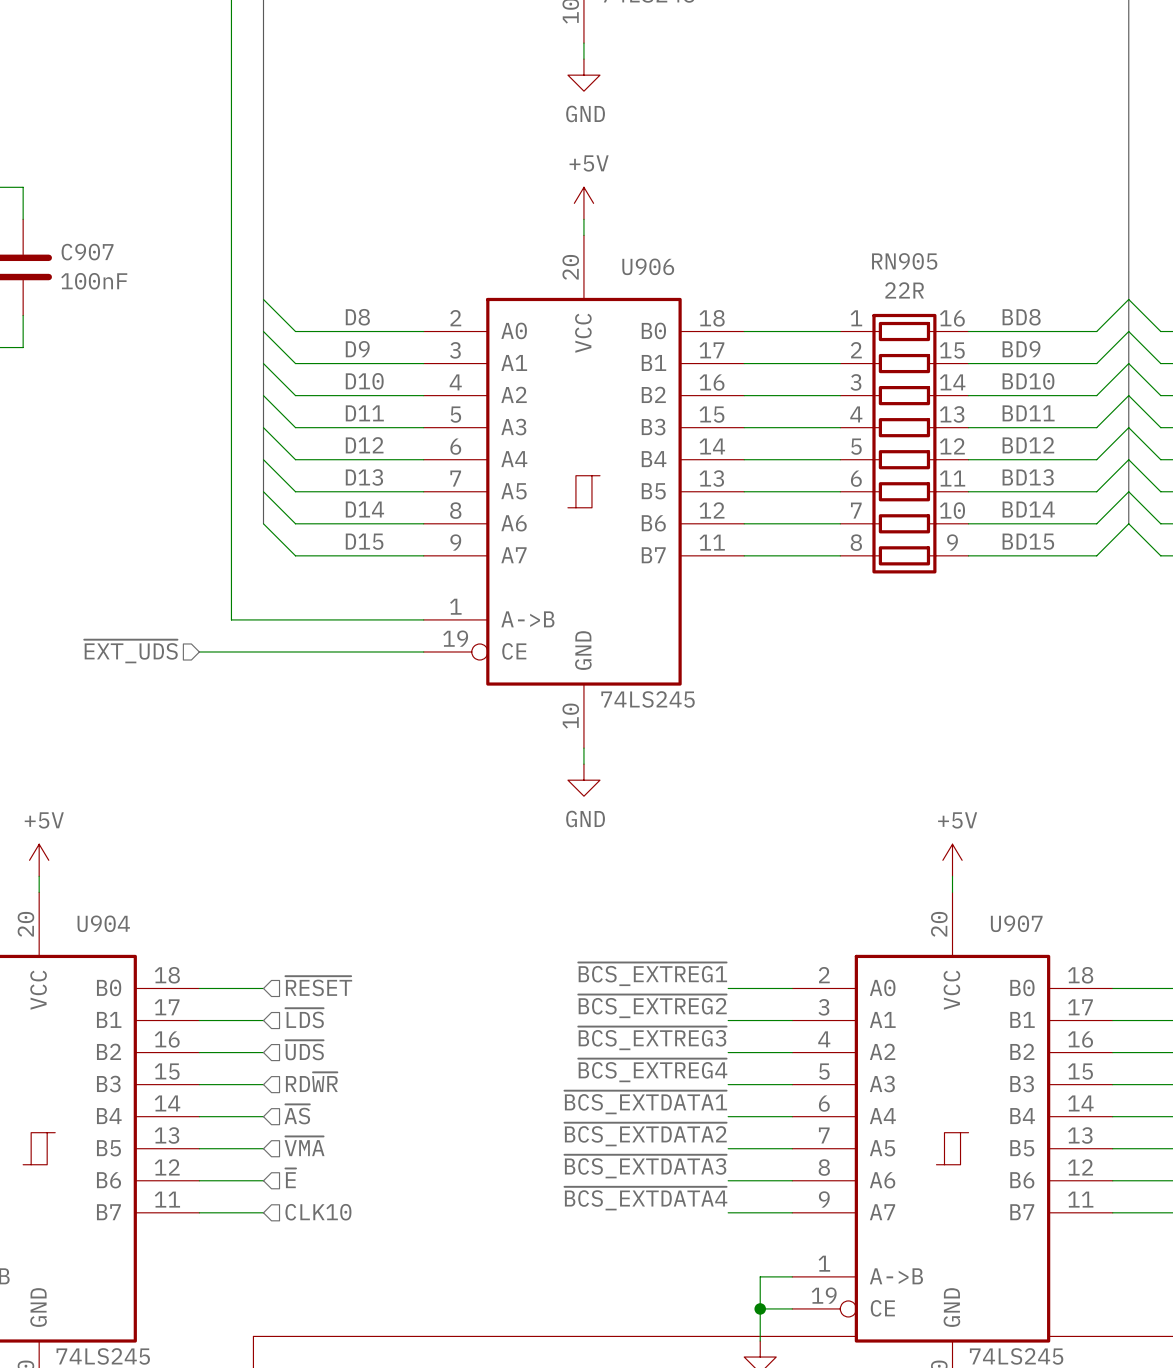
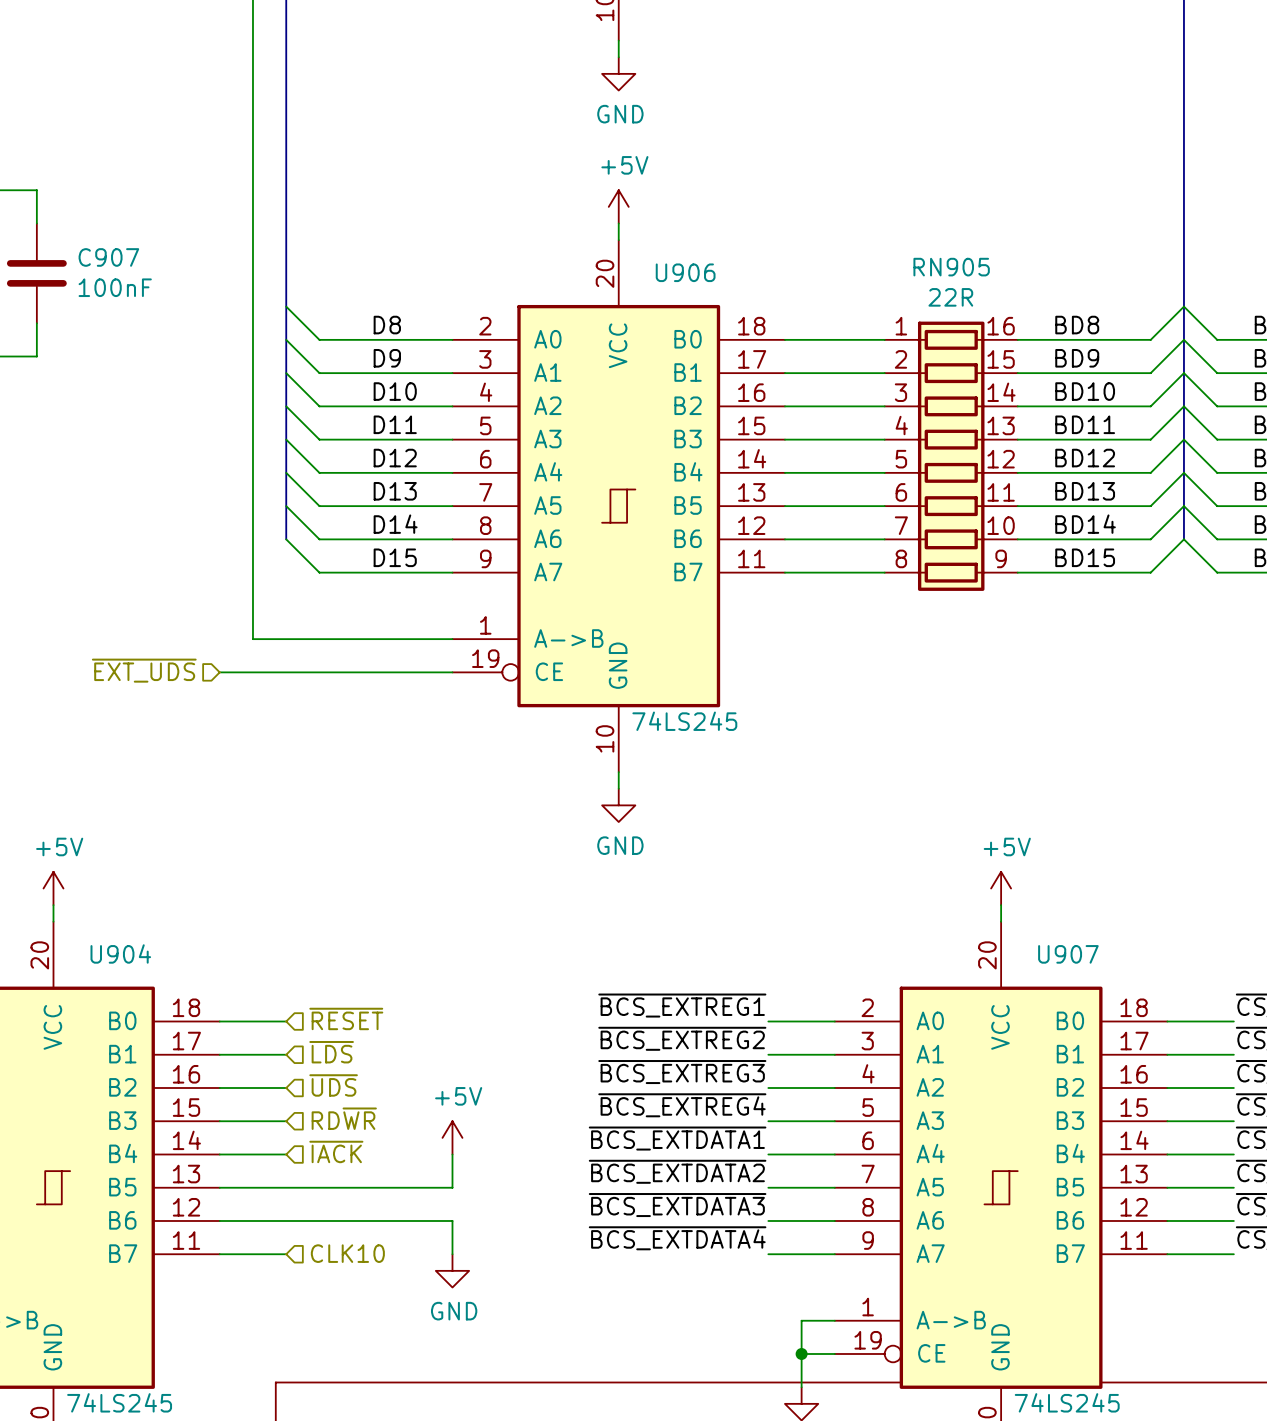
power symbol: none -> +5V (452, 1137)
hierarchical label: ~{AS} (297, 1114) -> ~{IACK} (336, 1151)
wire: none -> (452, 1154) (452, 1187) (286, 1187)
hierarchical label: ~{VMA} (304, 1146) -> none
hierarchical label: ~{E} (290, 1178) -> none
wire: none -> (286, 1220) (452, 1220) (452, 1254)
power symbol: none -> GND (452, 1270)

